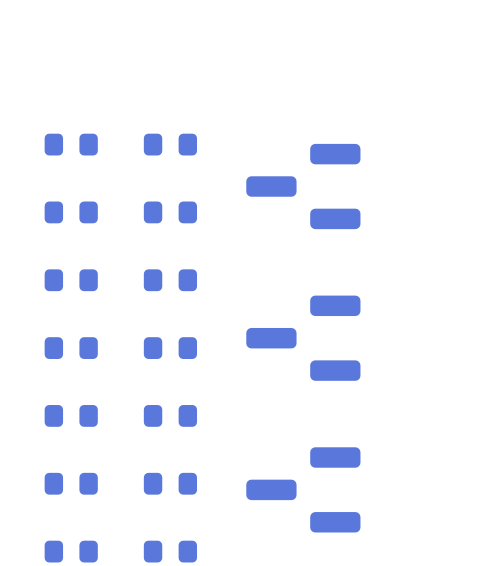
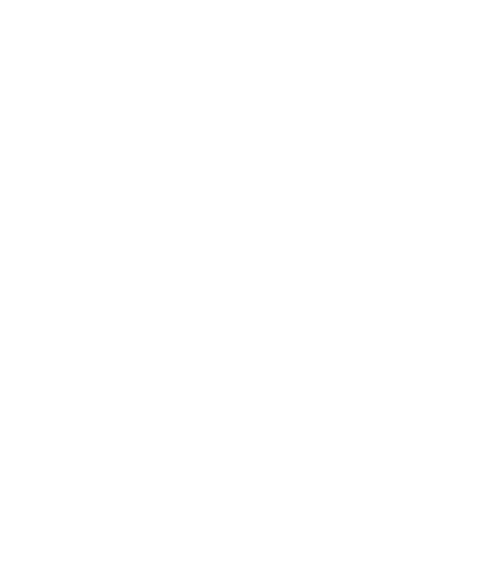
part: (71, 144) -> none
part: (170, 144) -> none
part: (303, 186) -> none
part: (71, 212) -> none
part: (170, 212) -> none
part: (71, 280) -> none
part: (170, 280) -> none
part: (303, 338) -> none
part: (71, 348) -> none
part: (170, 348) -> none
part: (71, 415) -> none
part: (170, 415) -> none
part: (71, 483) -> none
part: (170, 483) -> none
part: (303, 489) -> none
part: (71, 551) -> none
part: (170, 551) -> none

